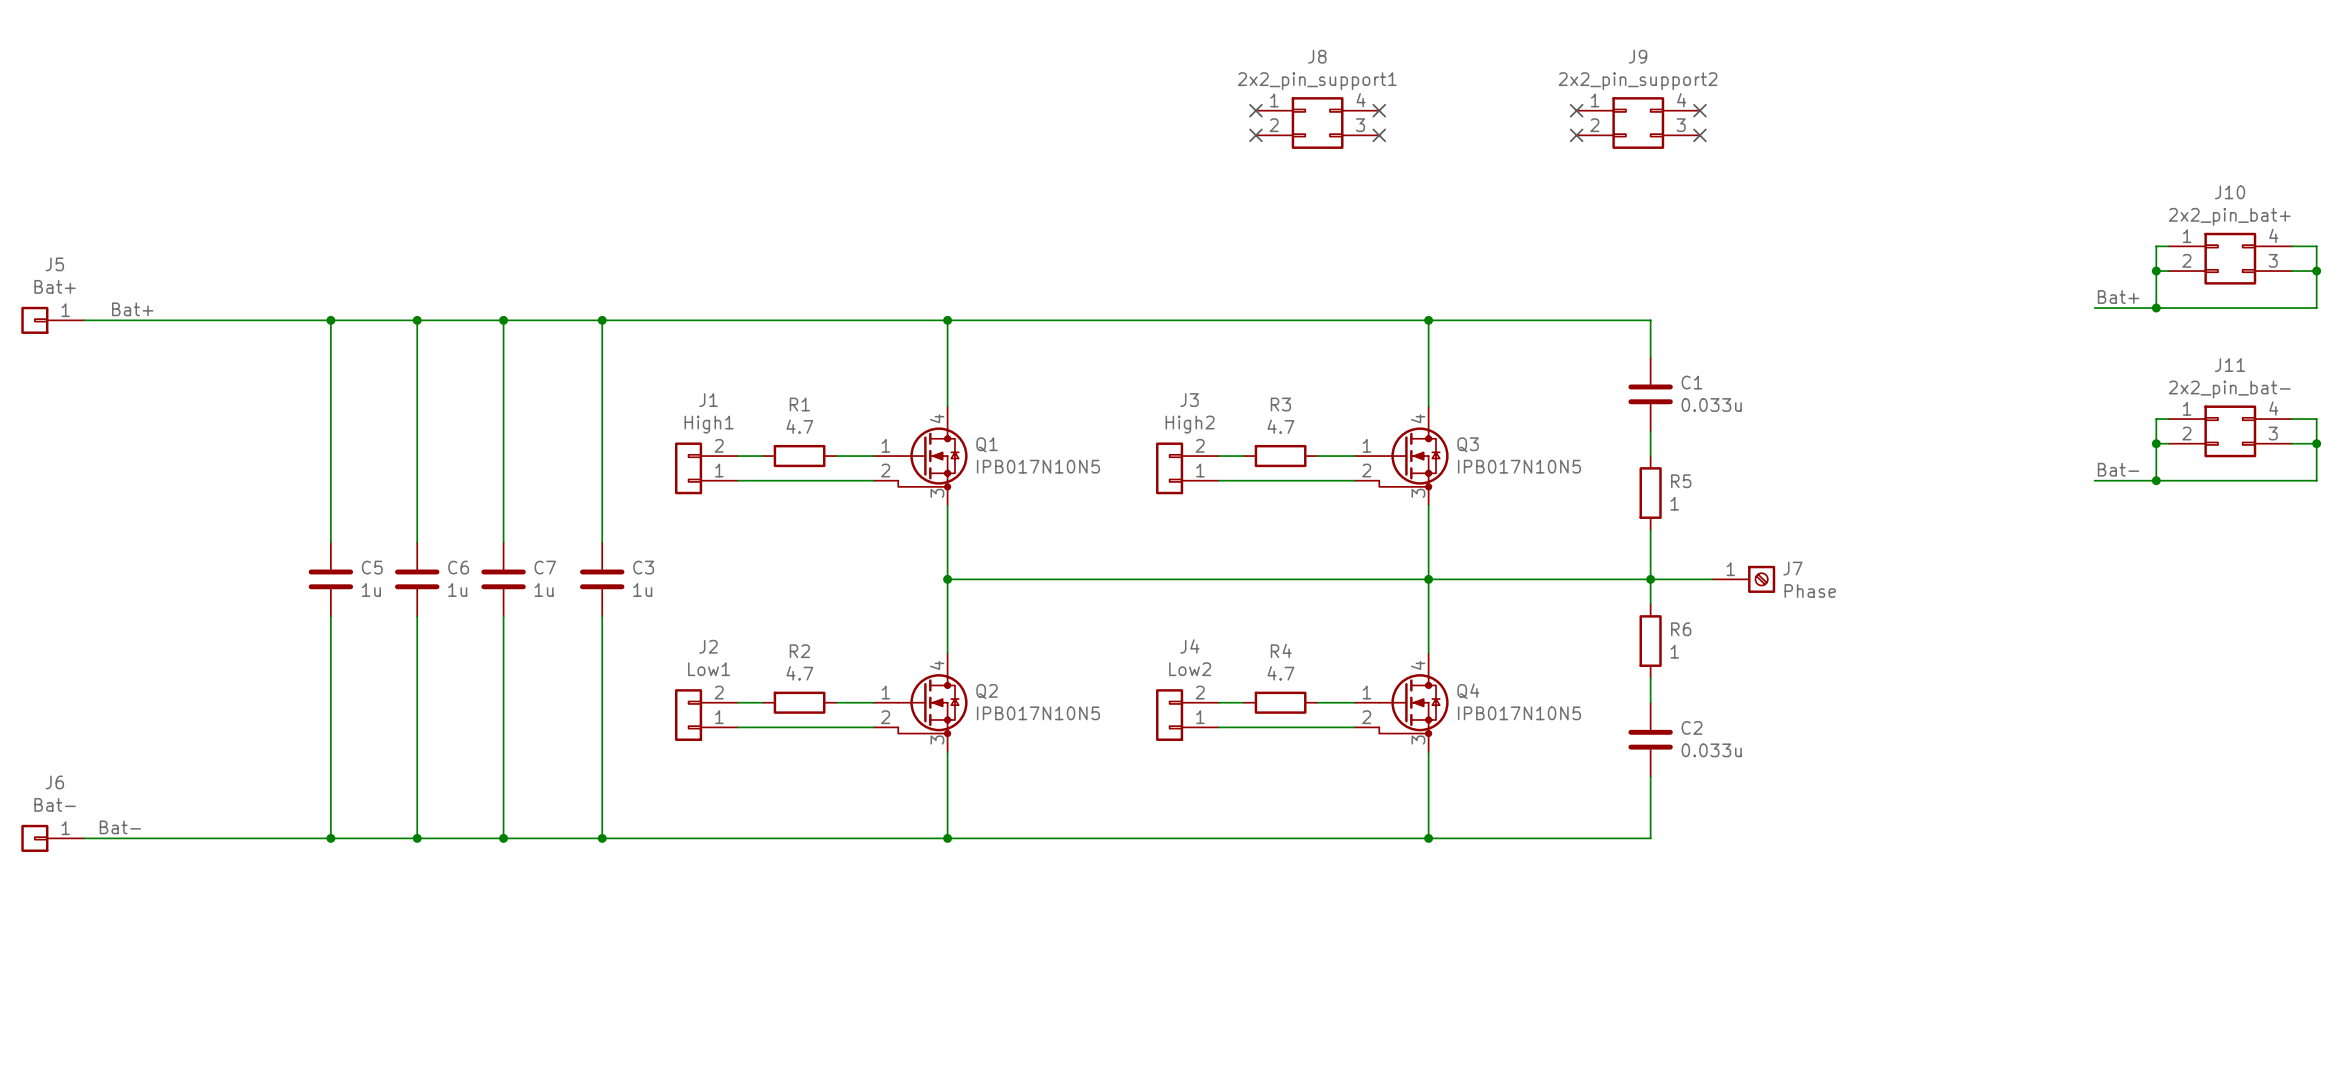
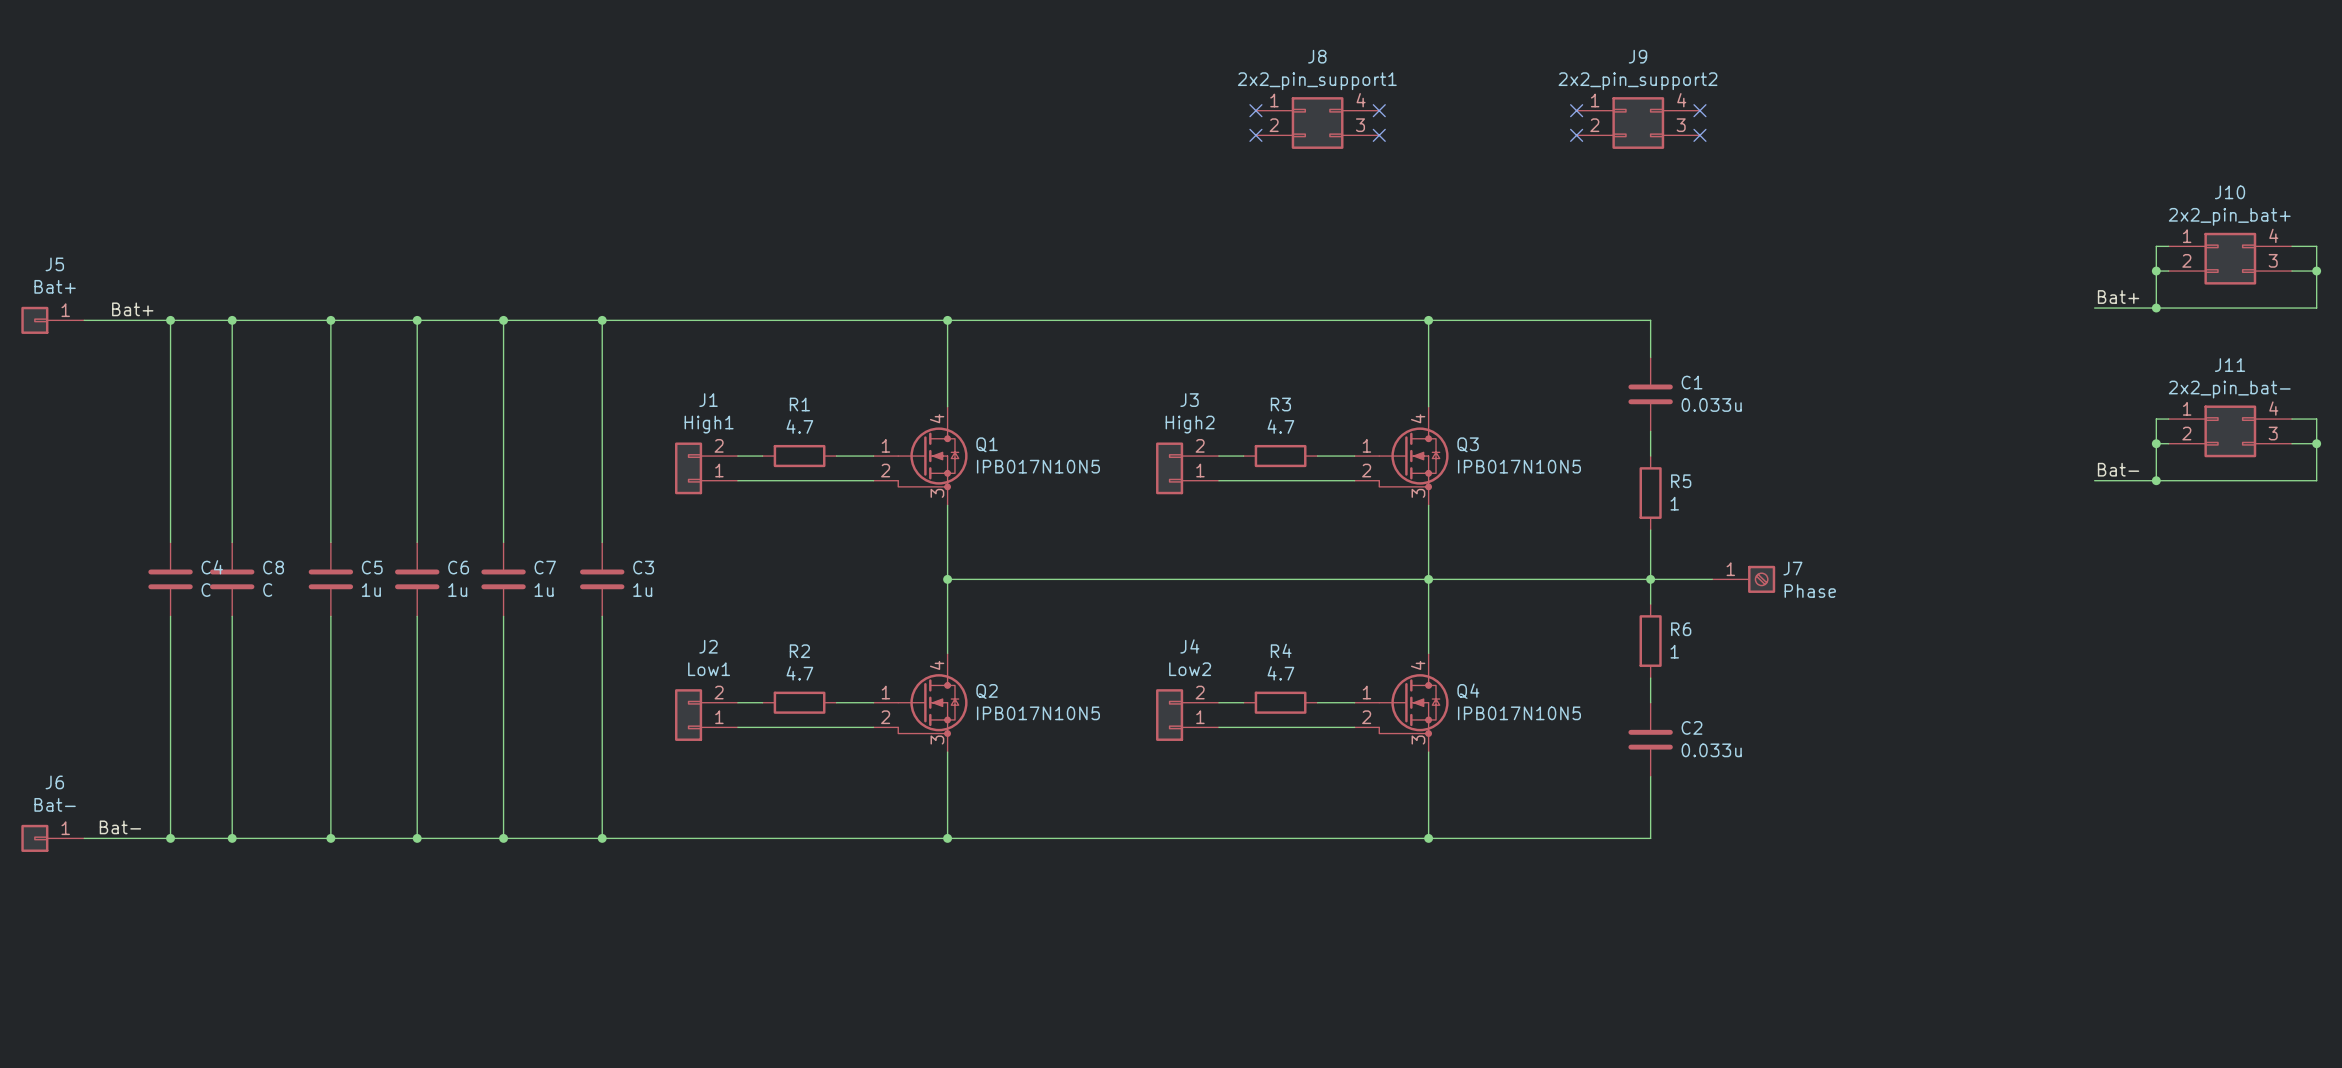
wire: none -> (170, 320) (170, 542)
junction: none -> (170, 320)
wire: none -> (232, 320) (232, 542)
junction: none -> (232, 320)
C4: none -> C (170, 579)
C8: none -> C (232, 579)
wire: none -> (170, 616) (170, 838)
wire: none -> (232, 616) (232, 838)
junction: none -> (170, 838)
junction: none -> (232, 838)

